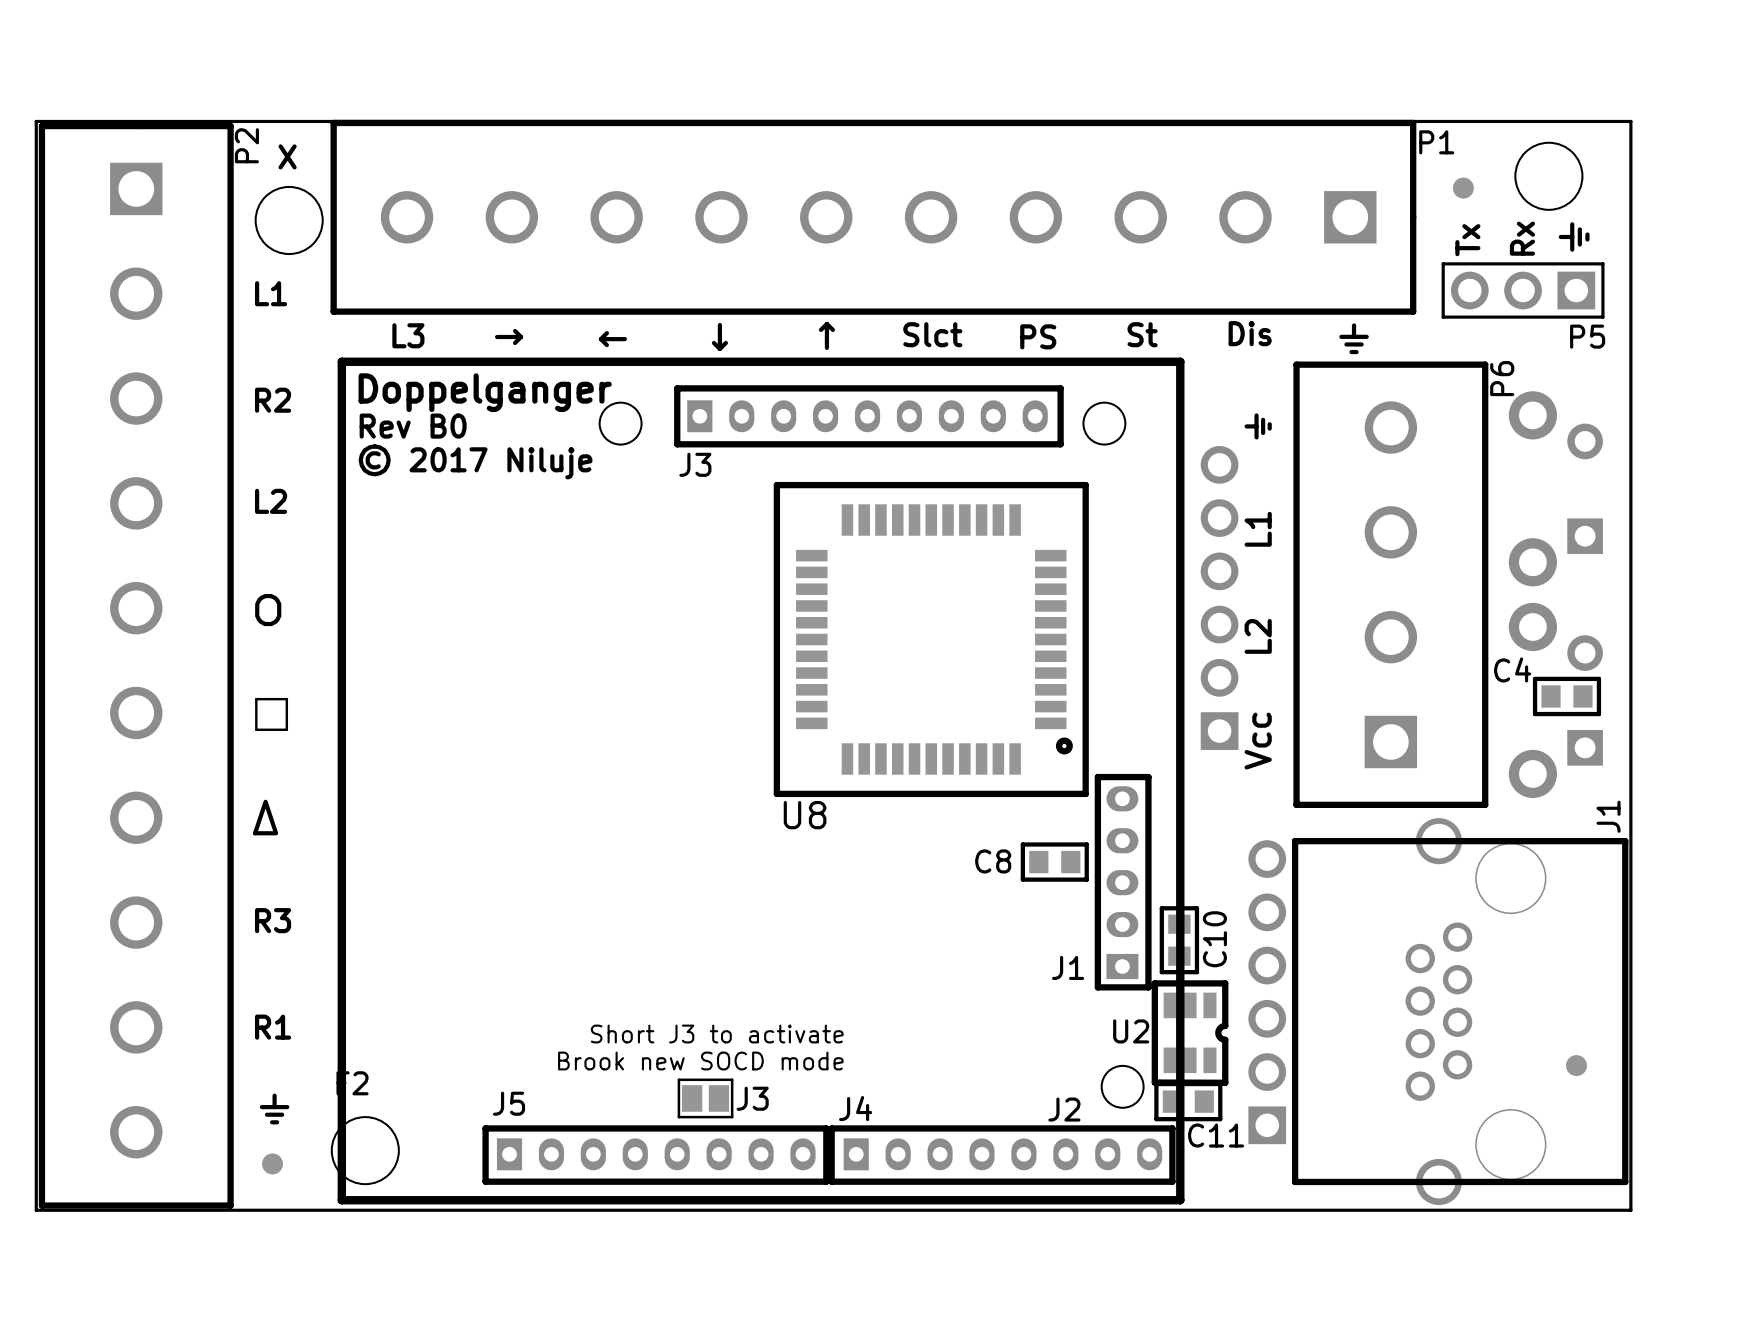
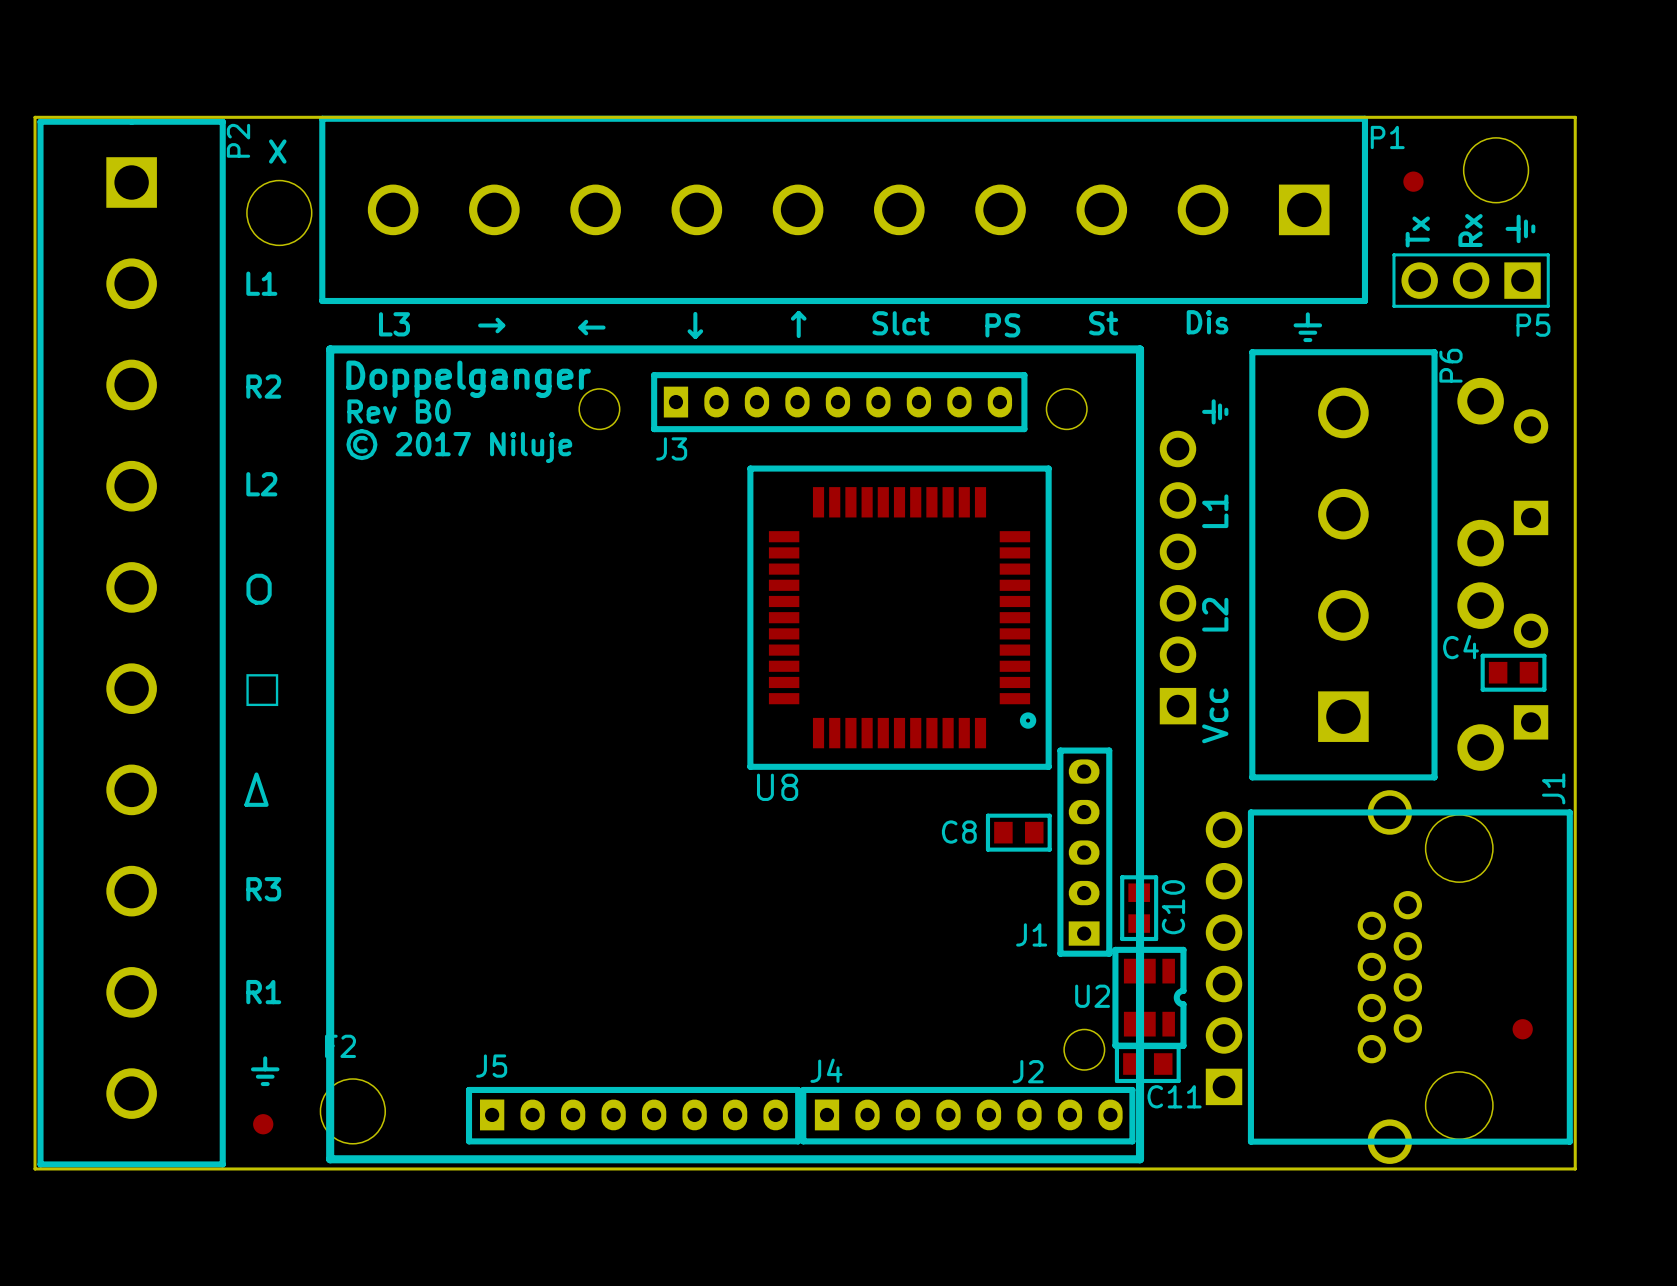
text: Short J3 to activate (717, 1034) -> none
text: Brook new SOCD mode (700, 1061) -> none
J3: (705, 1098) -> none

